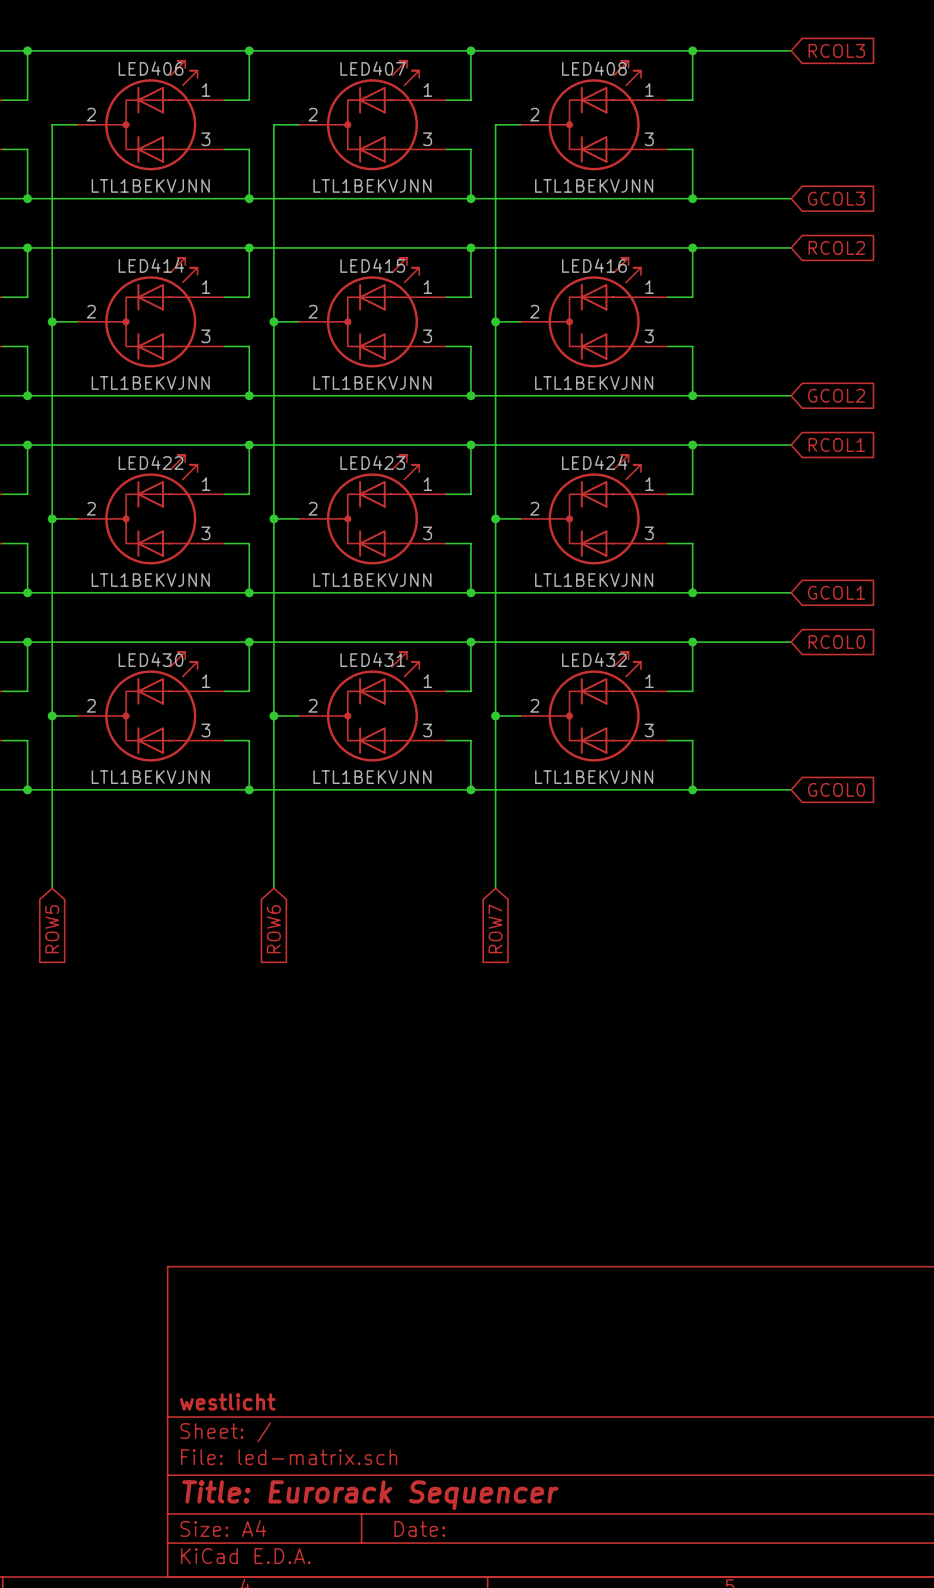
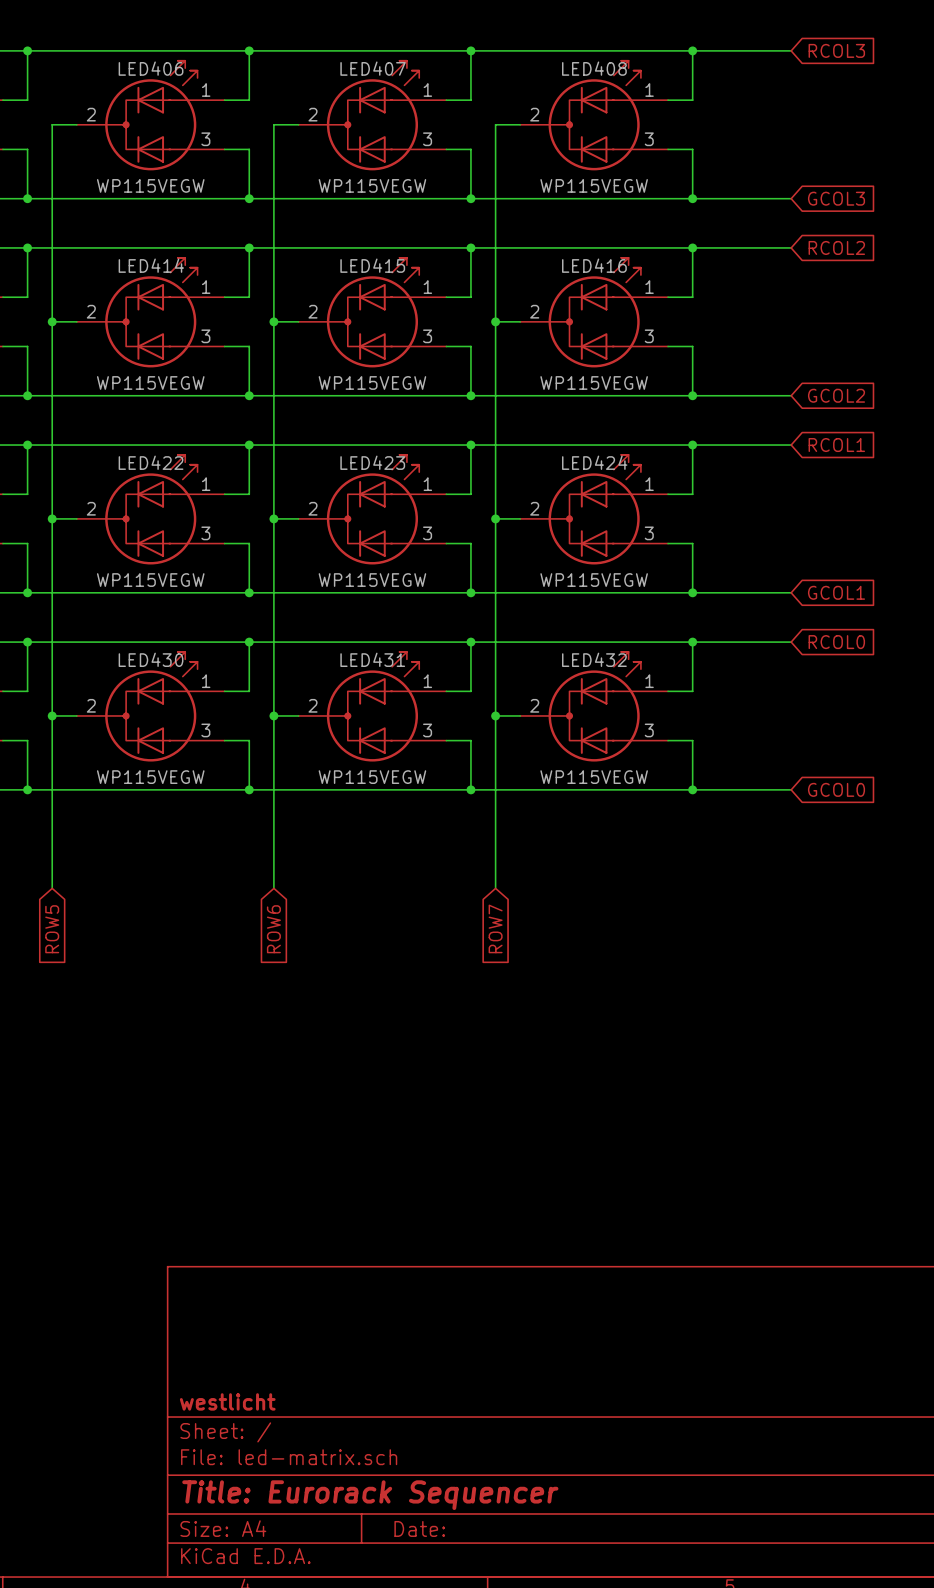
LED406 value: LTL1BEKVJNN (150, 185) -> WP115VEGW (150, 185)
LED407 value: LTL1BEKVJNN (372, 185) -> WP115VEGW (372, 185)
LED408 value: LTL1BEKVJNN (594, 185) -> WP115VEGW (594, 185)
LED414 value: LTL1BEKVJNN (150, 382) -> WP115VEGW (150, 382)
LED415 value: LTL1BEKVJNN (372, 382) -> WP115VEGW (372, 382)
LED416 value: LTL1BEKVJNN (594, 382) -> WP115VEGW (594, 382)
LED422 value: LTL1BEKVJNN (150, 580) -> WP115VEGW (150, 580)
LED423 value: LTL1BEKVJNN (372, 580) -> WP115VEGW (372, 580)
LED424 value: LTL1BEKVJNN (594, 580) -> WP115VEGW (594, 580)
LED430 value: LTL1BEKVJNN (150, 777) -> WP115VEGW (150, 777)
LED431 value: LTL1BEKVJNN (372, 777) -> WP115VEGW (372, 777)
LED432 value: LTL1BEKVJNN (594, 777) -> WP115VEGW (594, 777)

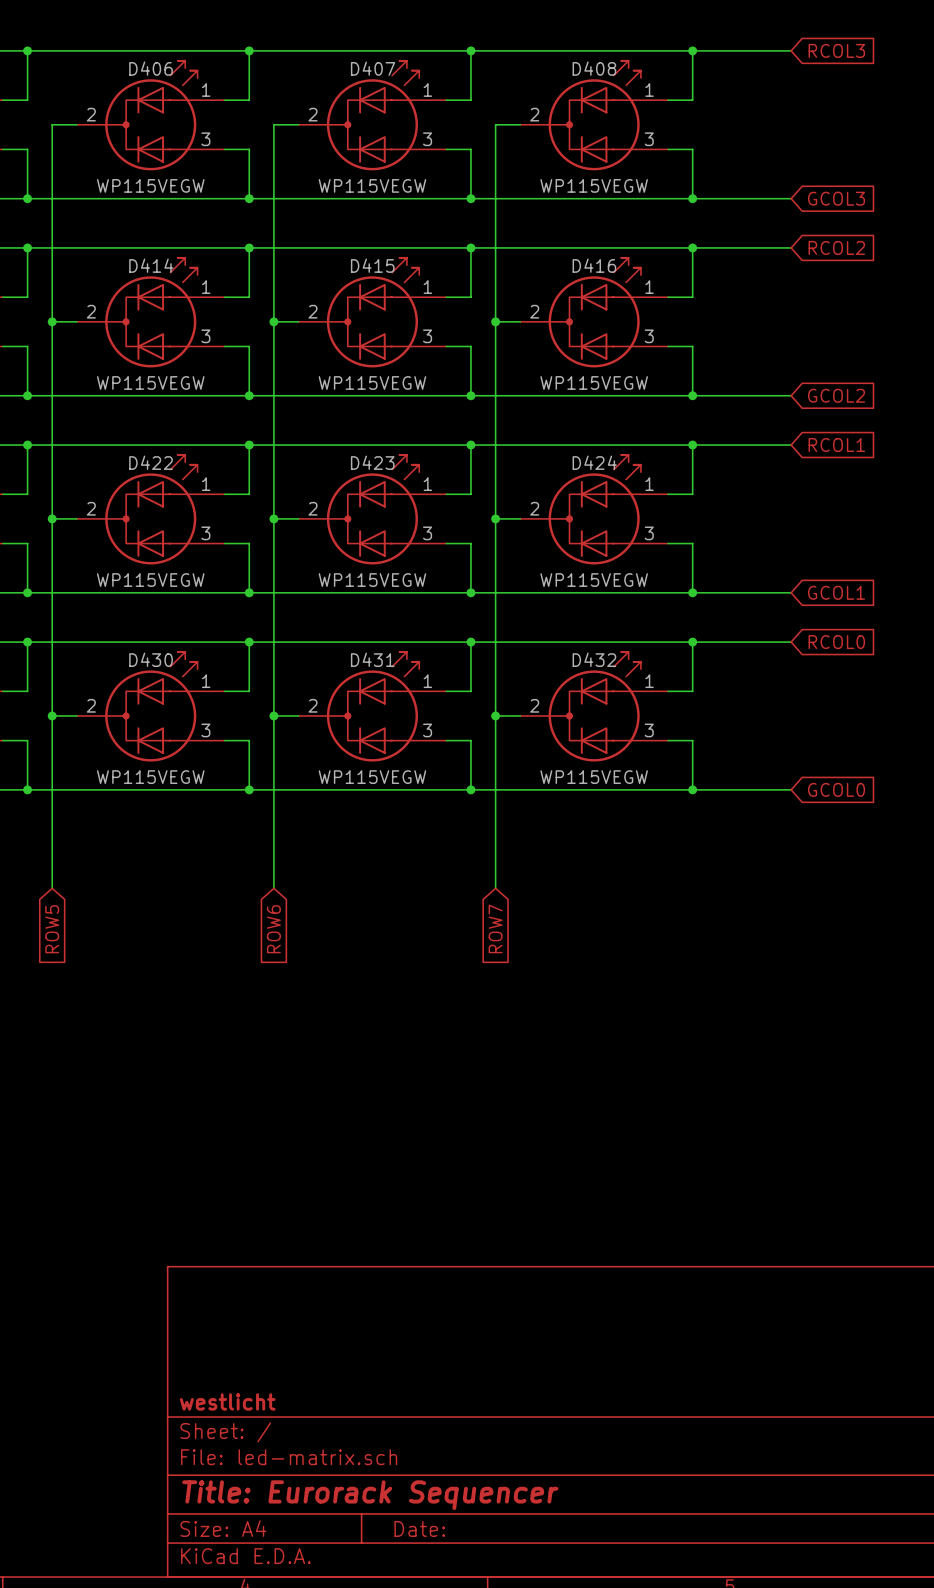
LED406 name: LED406 (151, 68) -> D406 (151, 68)
LED407 name: LED407 (373, 68) -> D407 (373, 68)
LED408 name: LED408 (594, 68) -> D408 (594, 68)
LED414 name: LED414 (151, 265) -> D414 (151, 265)
LED415 name: LED415 (372, 265) -> D415 (372, 265)
LED416 name: LED416 (594, 265) -> D416 (594, 265)
LED422 name: LED422 (151, 462) -> D422 (151, 462)
LED423 name: LED423 (372, 462) -> D423 (372, 462)
LED424 name: LED424 (594, 462) -> D424 (594, 462)
LED430 name: LED430 (151, 659) -> D430 (151, 659)
LED431 name: LED431 (372, 659) -> D431 (372, 659)
LED432 name: LED432 (594, 659) -> D432 (594, 659)

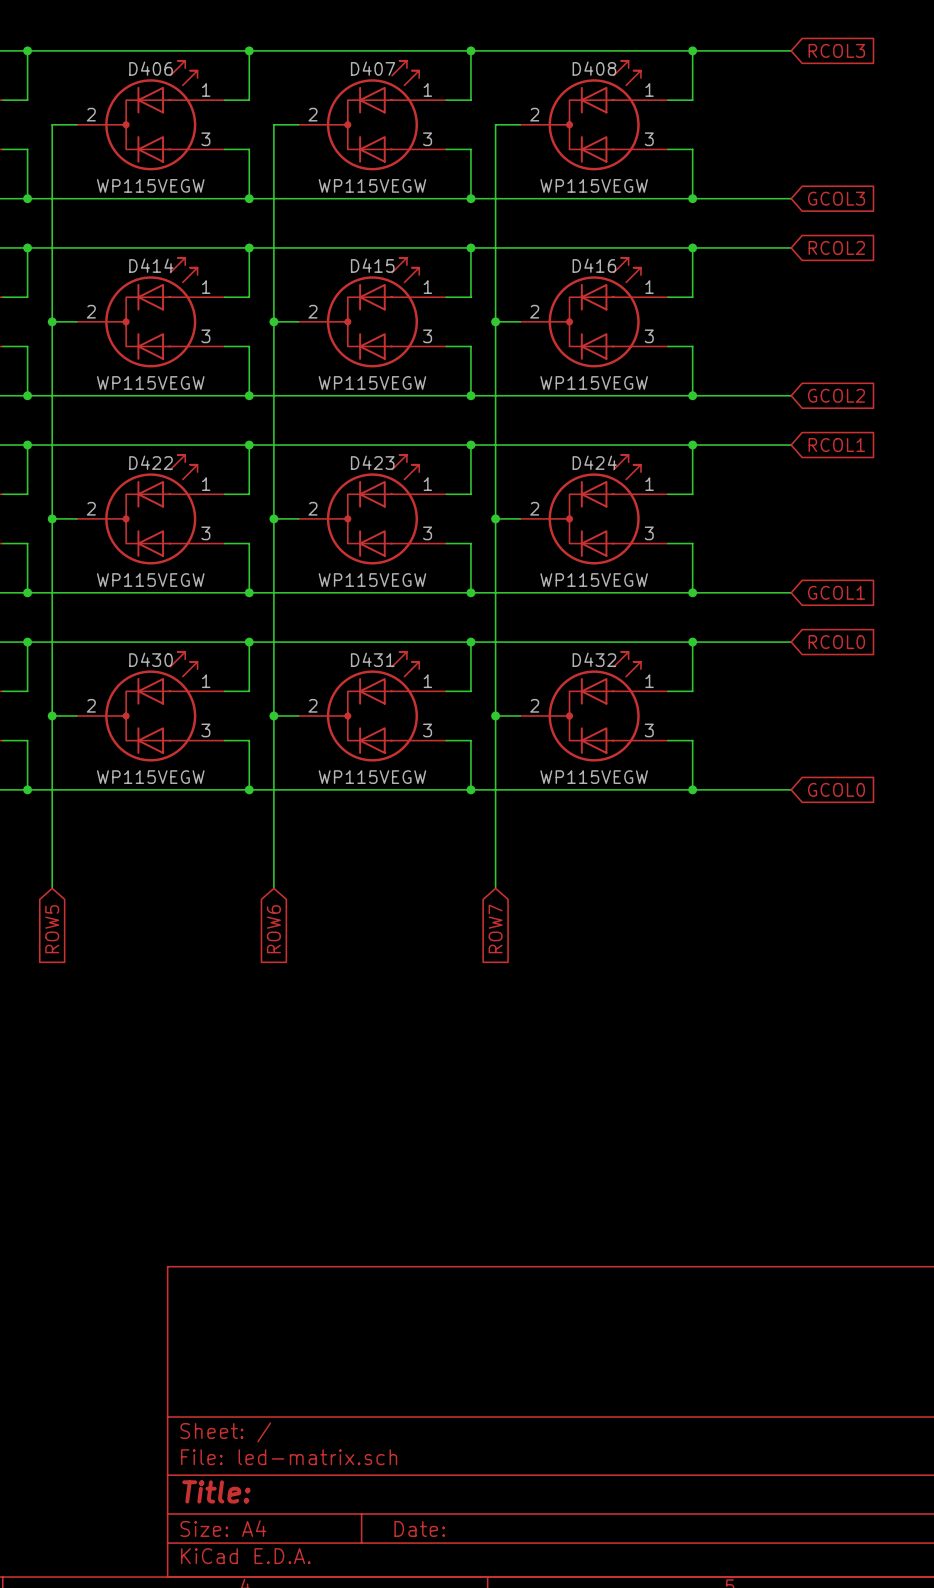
title block: westlicht (227, 1401) -> none
title block: Title: Eurorack Sequencer (370, 1495) -> Title: (216, 1491)

